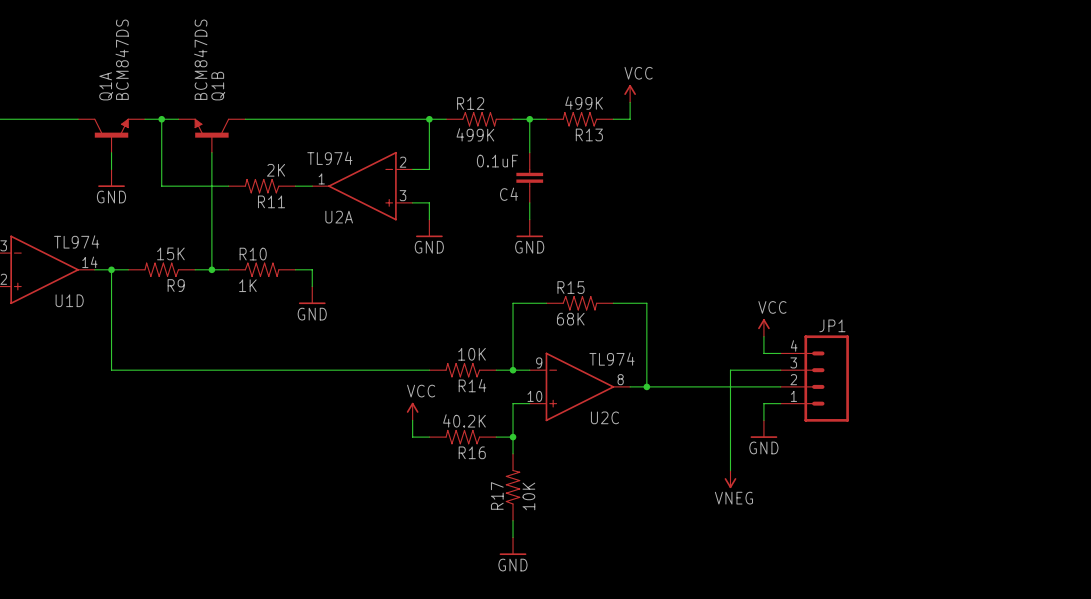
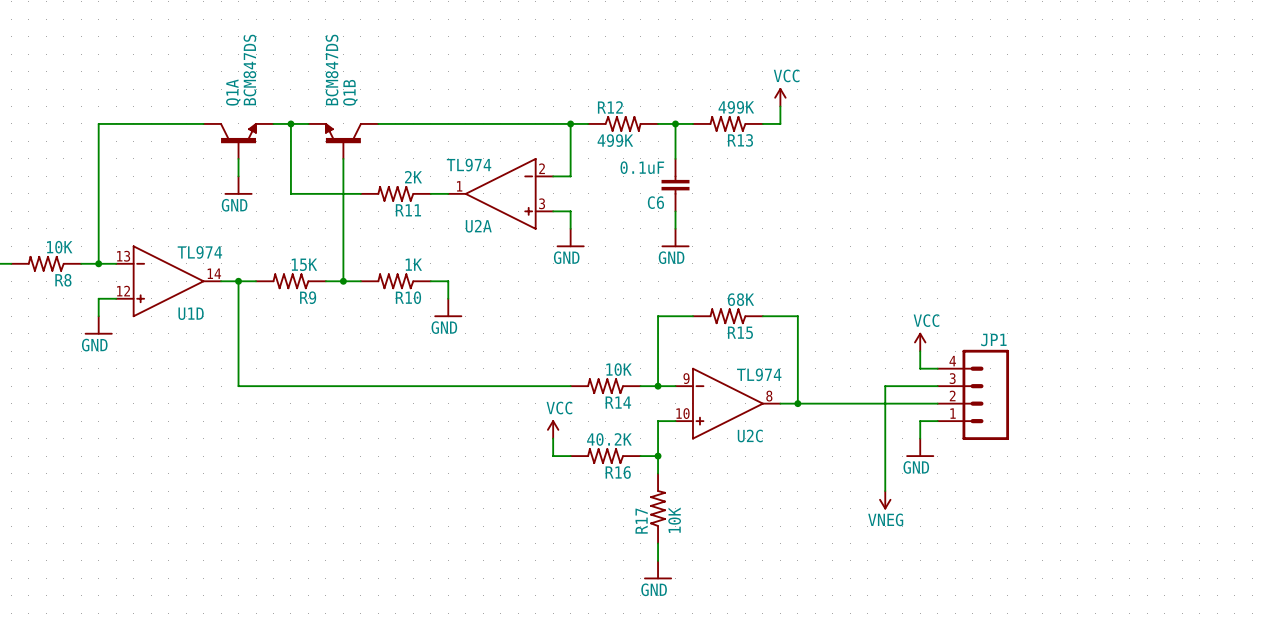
C4 name: C4 (509, 194) -> C6 (655, 202)
R10 rotation: 0° (262, 269) -> 180° (395, 281)
R15 rotation: 0° (579, 303) -> 180° (727, 316)

